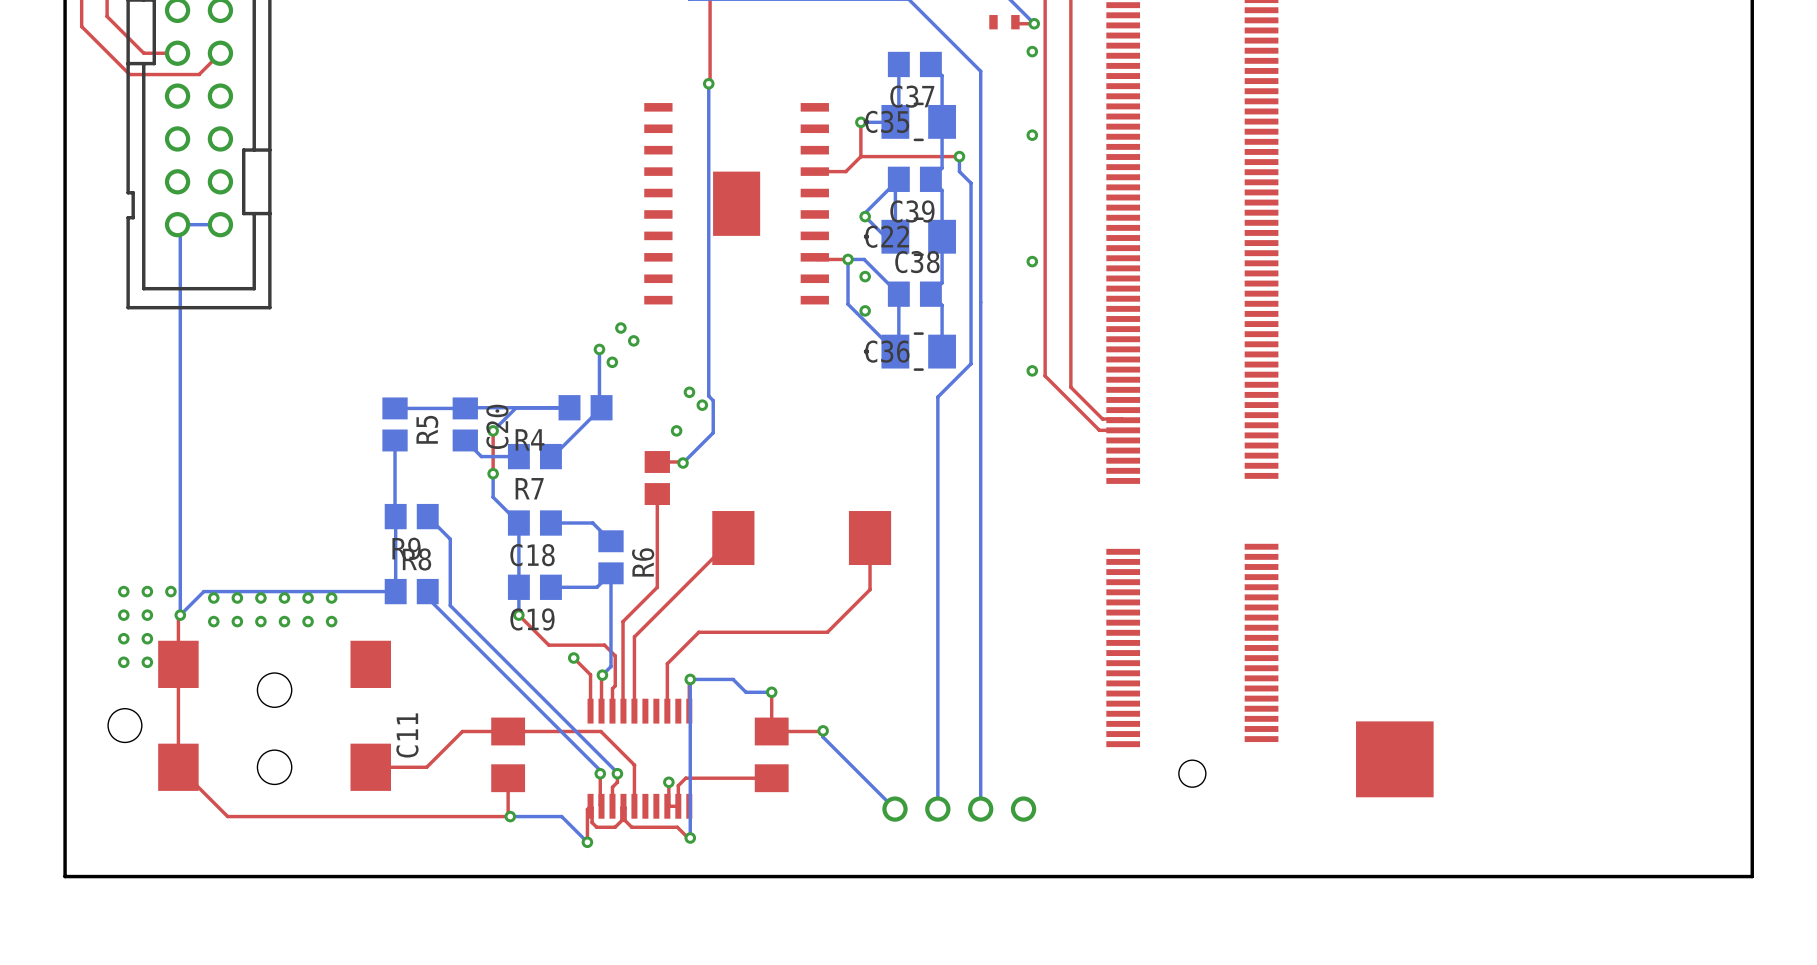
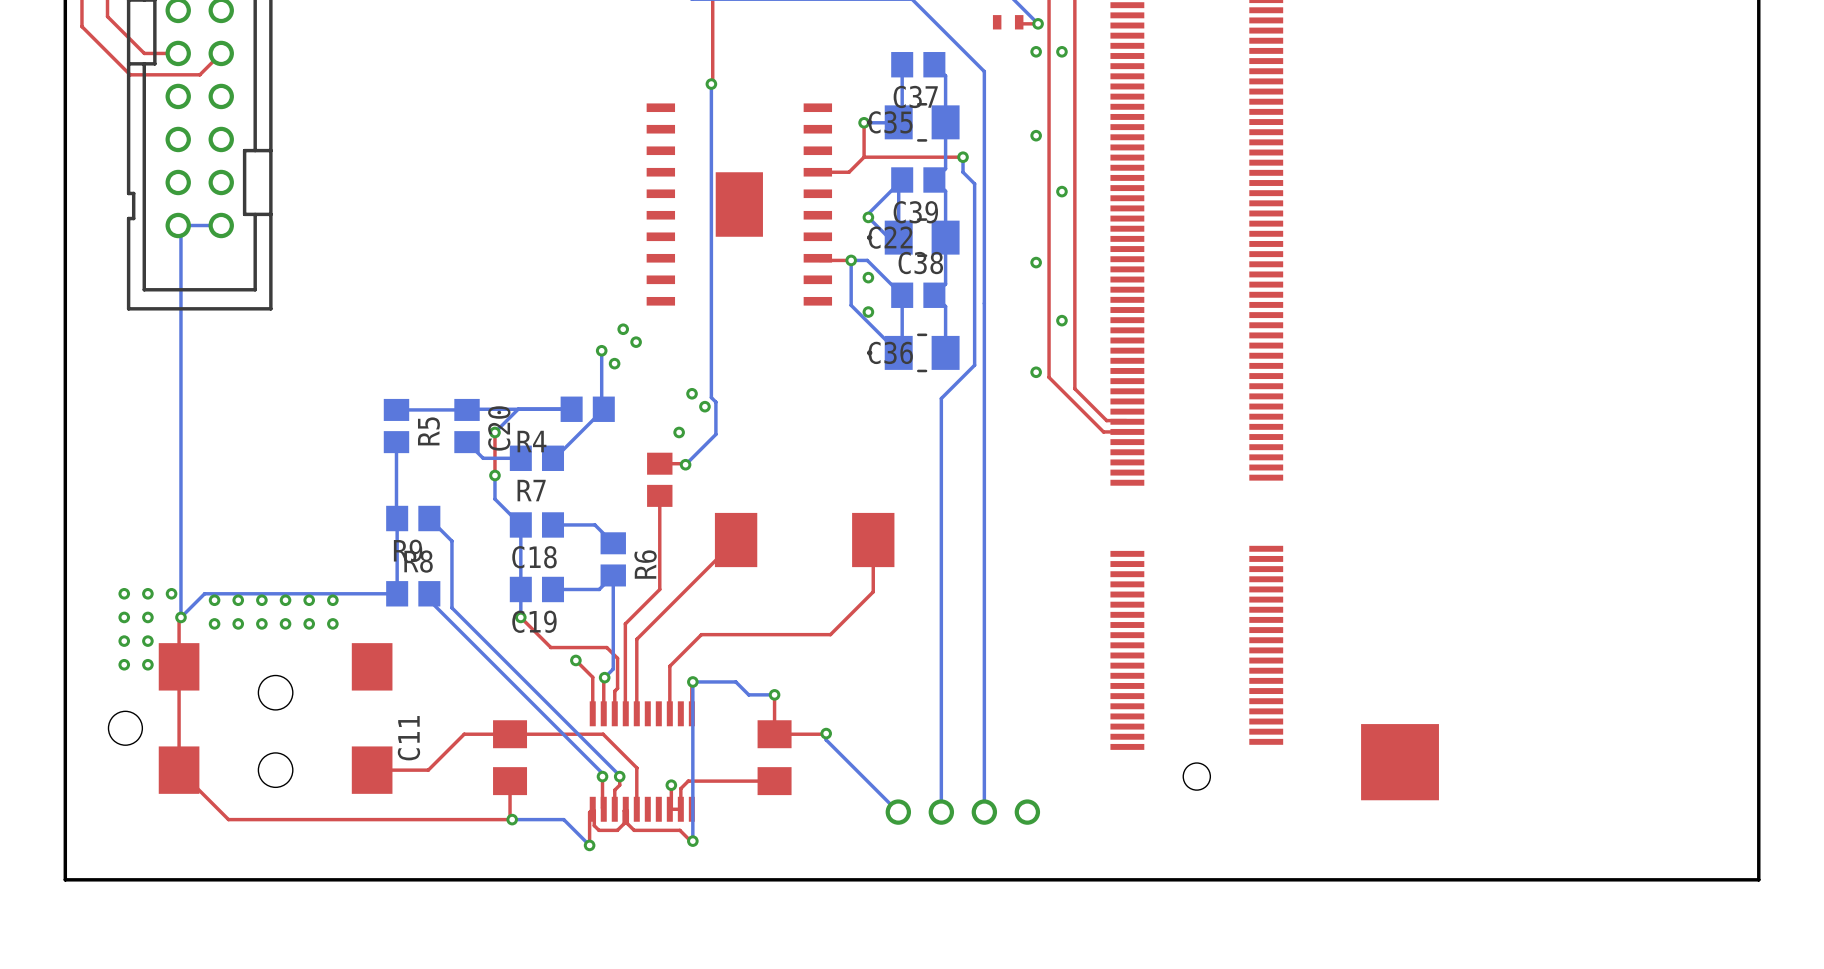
via: none -> (1061, 51)
via: none -> (1061, 191)
via: none -> (1061, 320)

